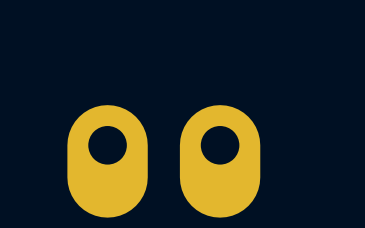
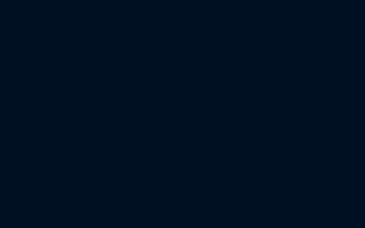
part: (163, 161) -> none

